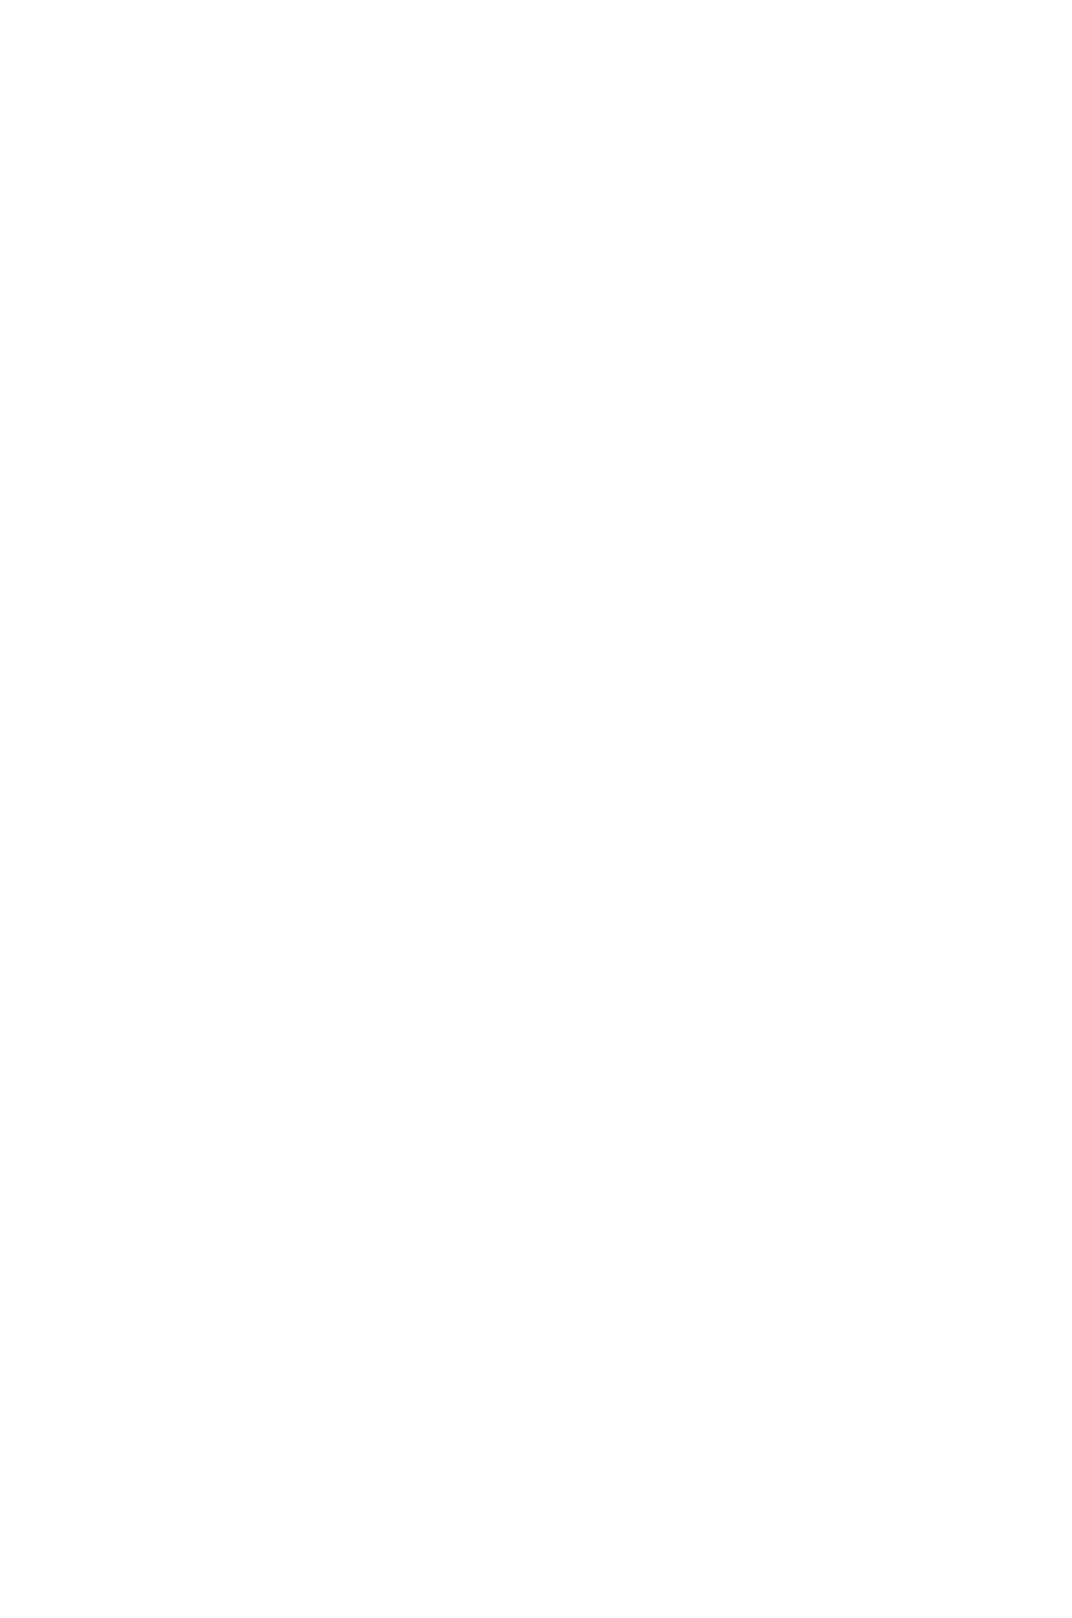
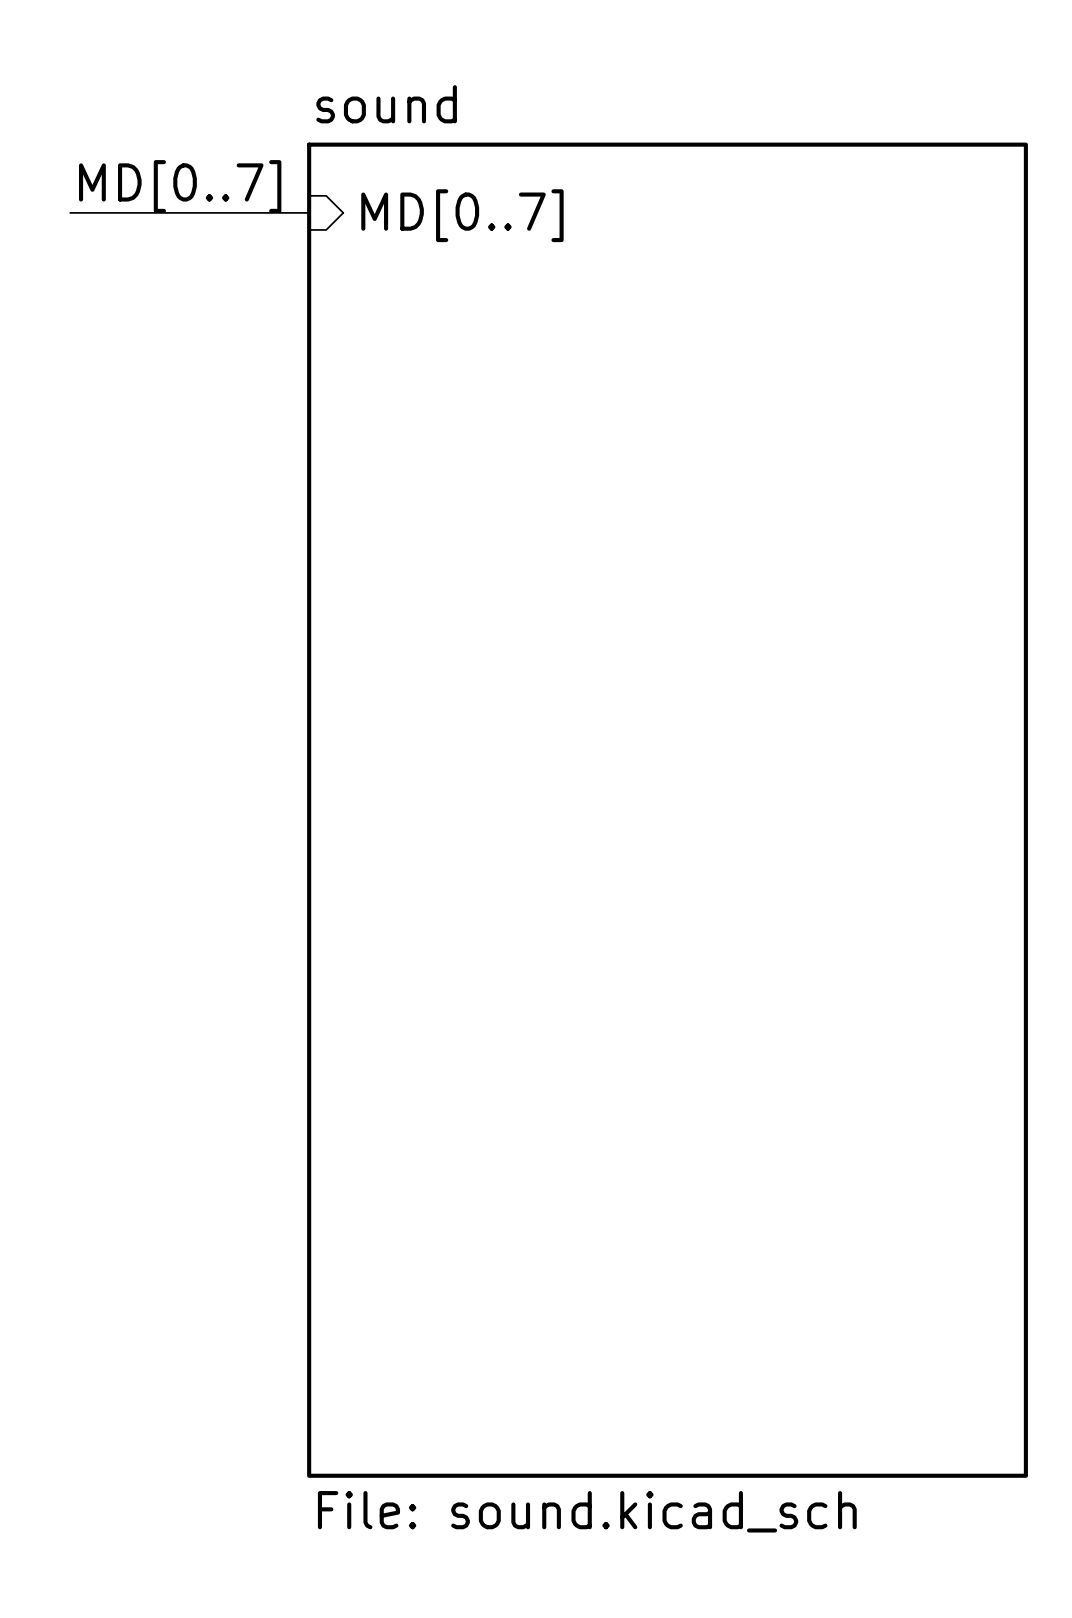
label: none -> MD[0..7] (180, 186)
bus: none -> (70, 212) (309, 212)
sheet pin: none -> MD[0..7] (462, 215)
sheet sound: none -> File: sound.kicad_sch (667, 810)

